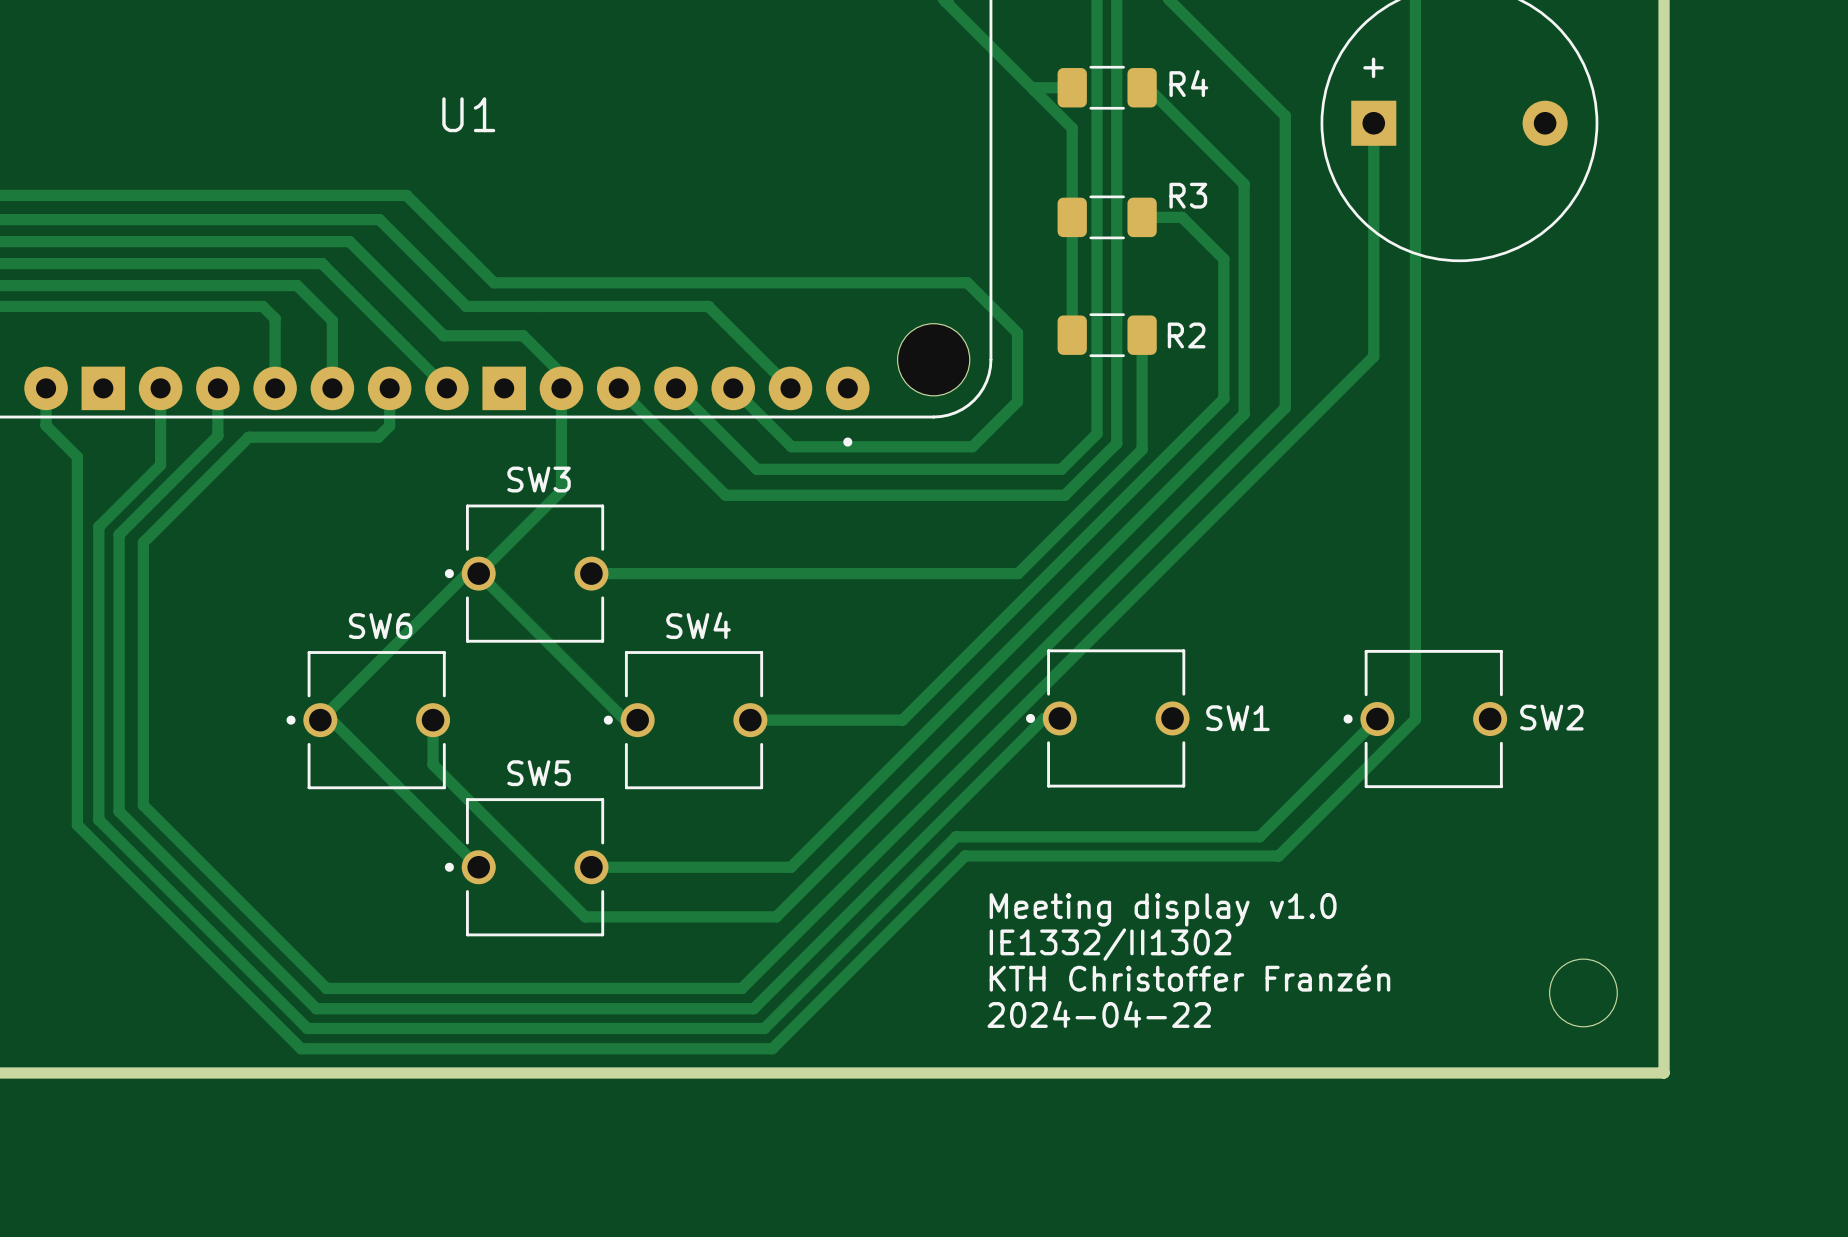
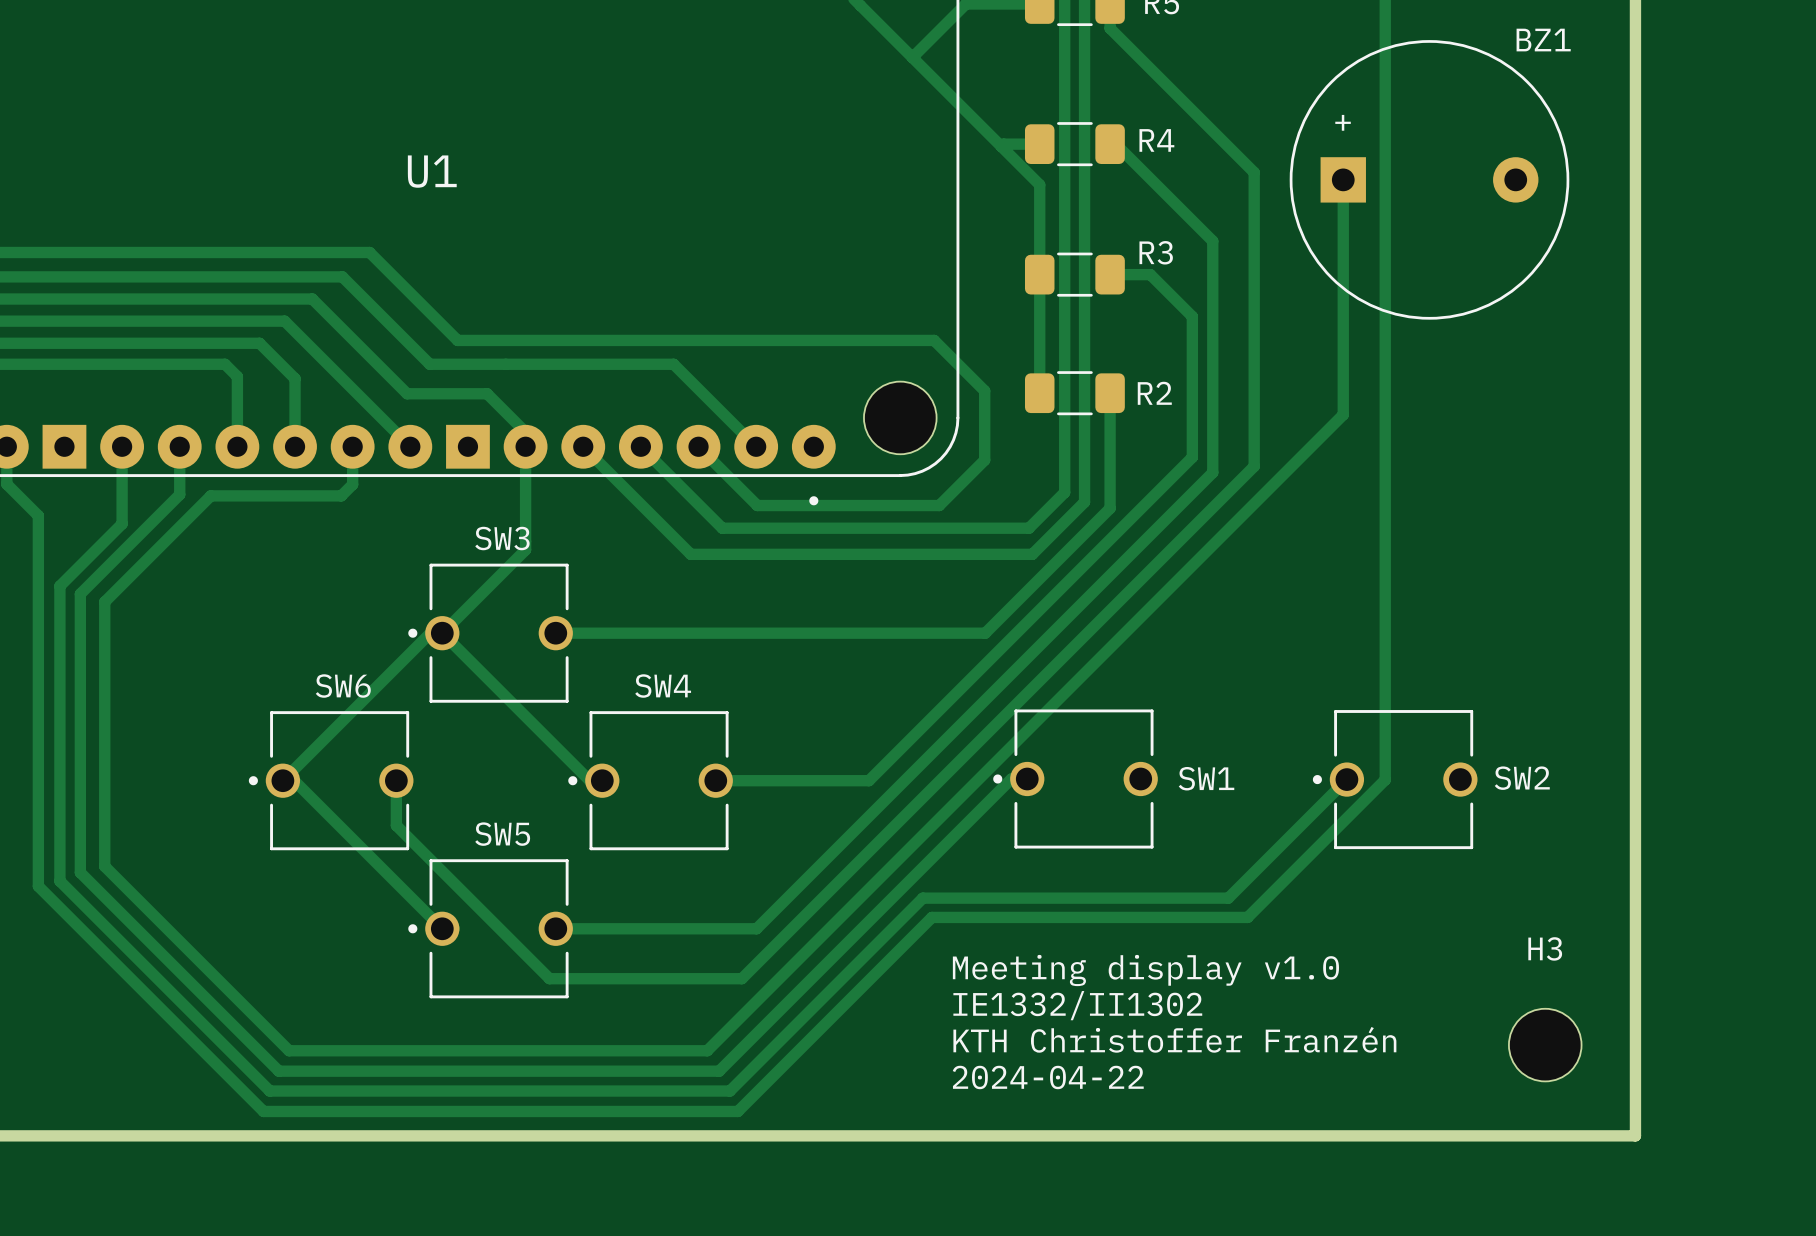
round board edge: [1549, 958, 1618, 1028] -> none
H3: none -> (1545, 1045)

